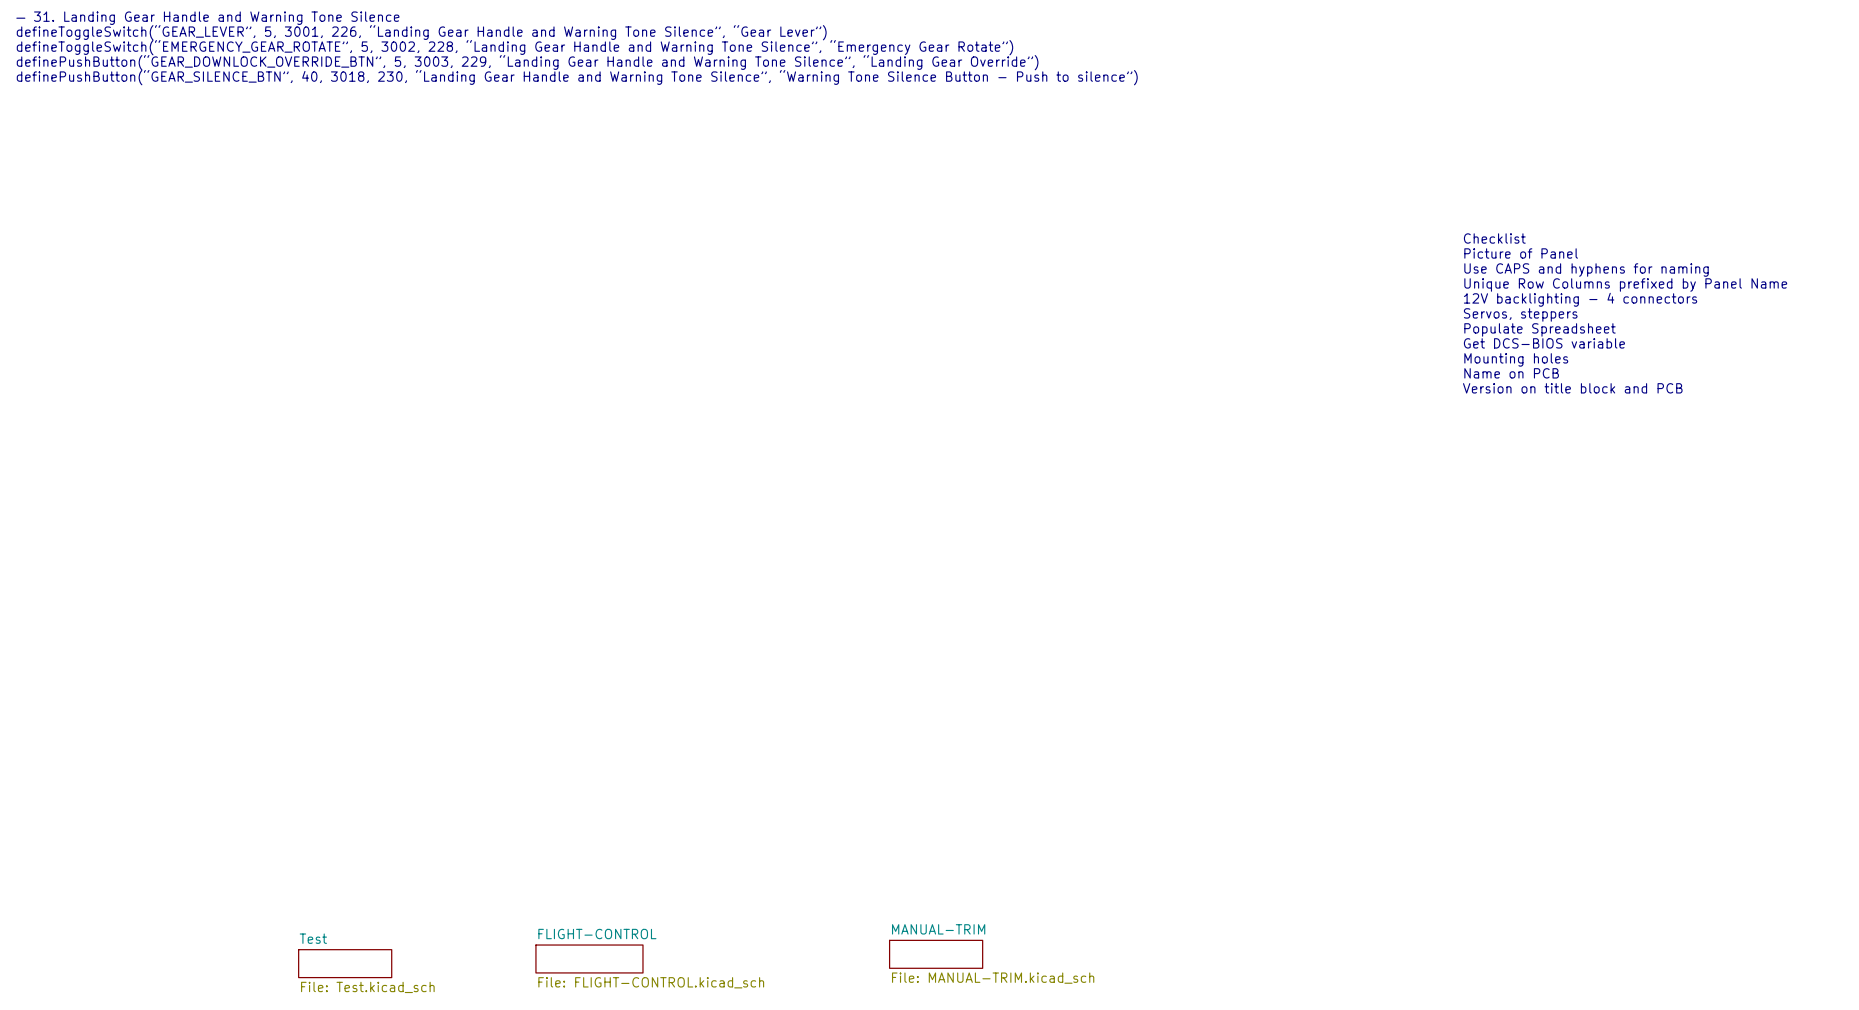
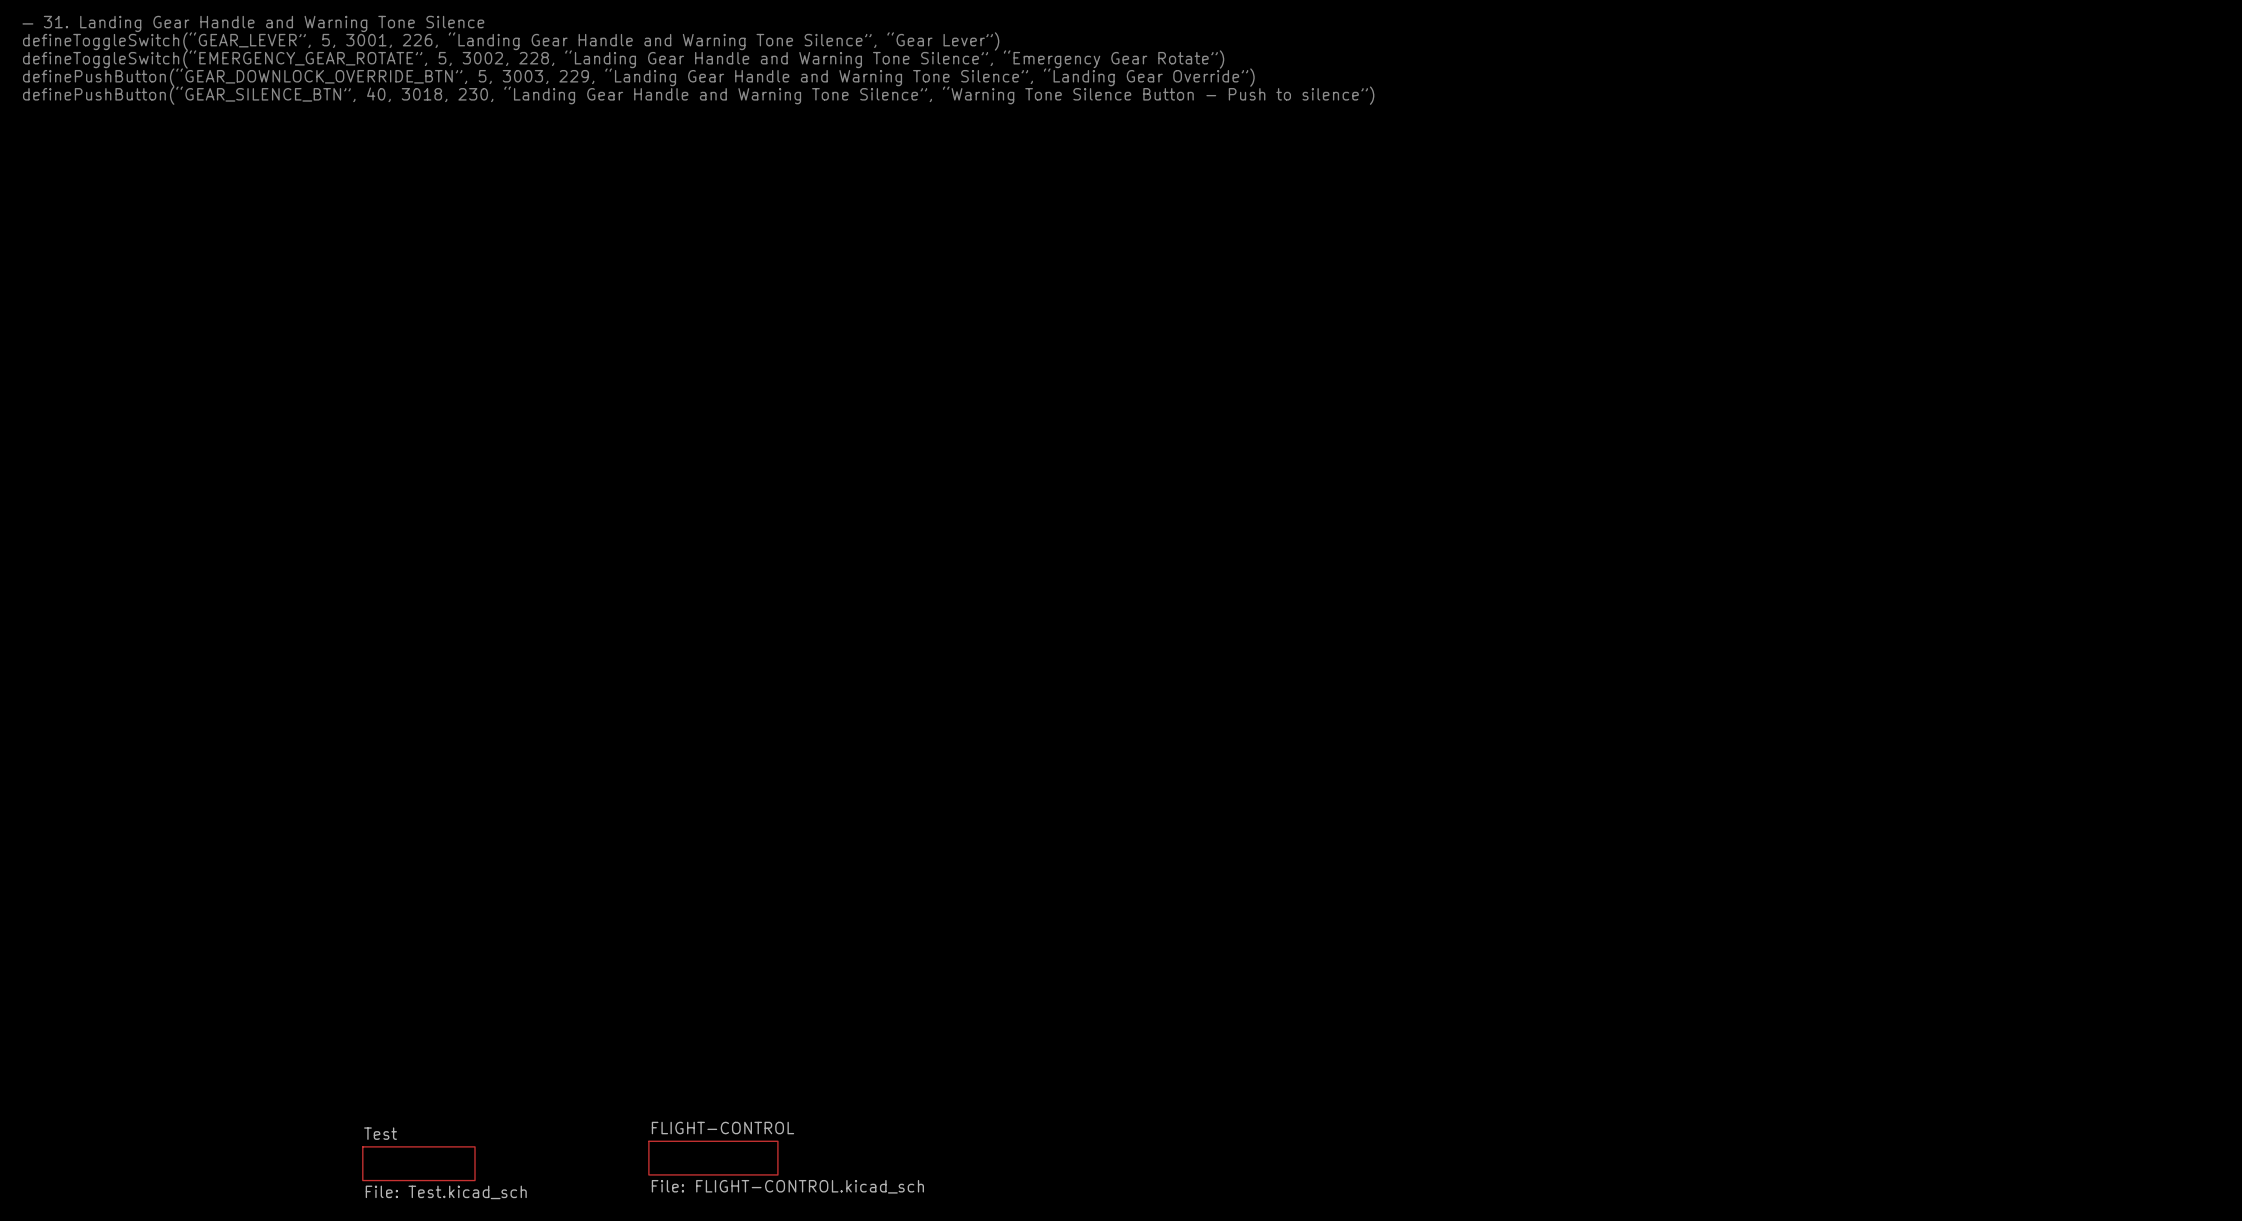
text: Checklist (1494, 238) -> none
text: Picture of Panel (1521, 253) -> none
text: Use CAPS and hyphens for naming (1586, 270) -> none
text: Unique Row Columns prefixed by Panel Name (1625, 285) -> none
text: 12V backlighting - 4 connectors (1580, 299) -> none
text: Servos, steppers (1520, 314) -> none
text: Populate Spreadsheet (1539, 329) -> none
text: Get DCS-BIOS variable (1544, 343) -> none
text: Mounting holes (1516, 359) -> none
text: Name on PCB (1511, 373) -> none
text: Version on title block and PCB (1572, 388) -> none
sheet MANUAL-TRIM: File: MANUAL-TRIM.kicad_sch (936, 954) -> none

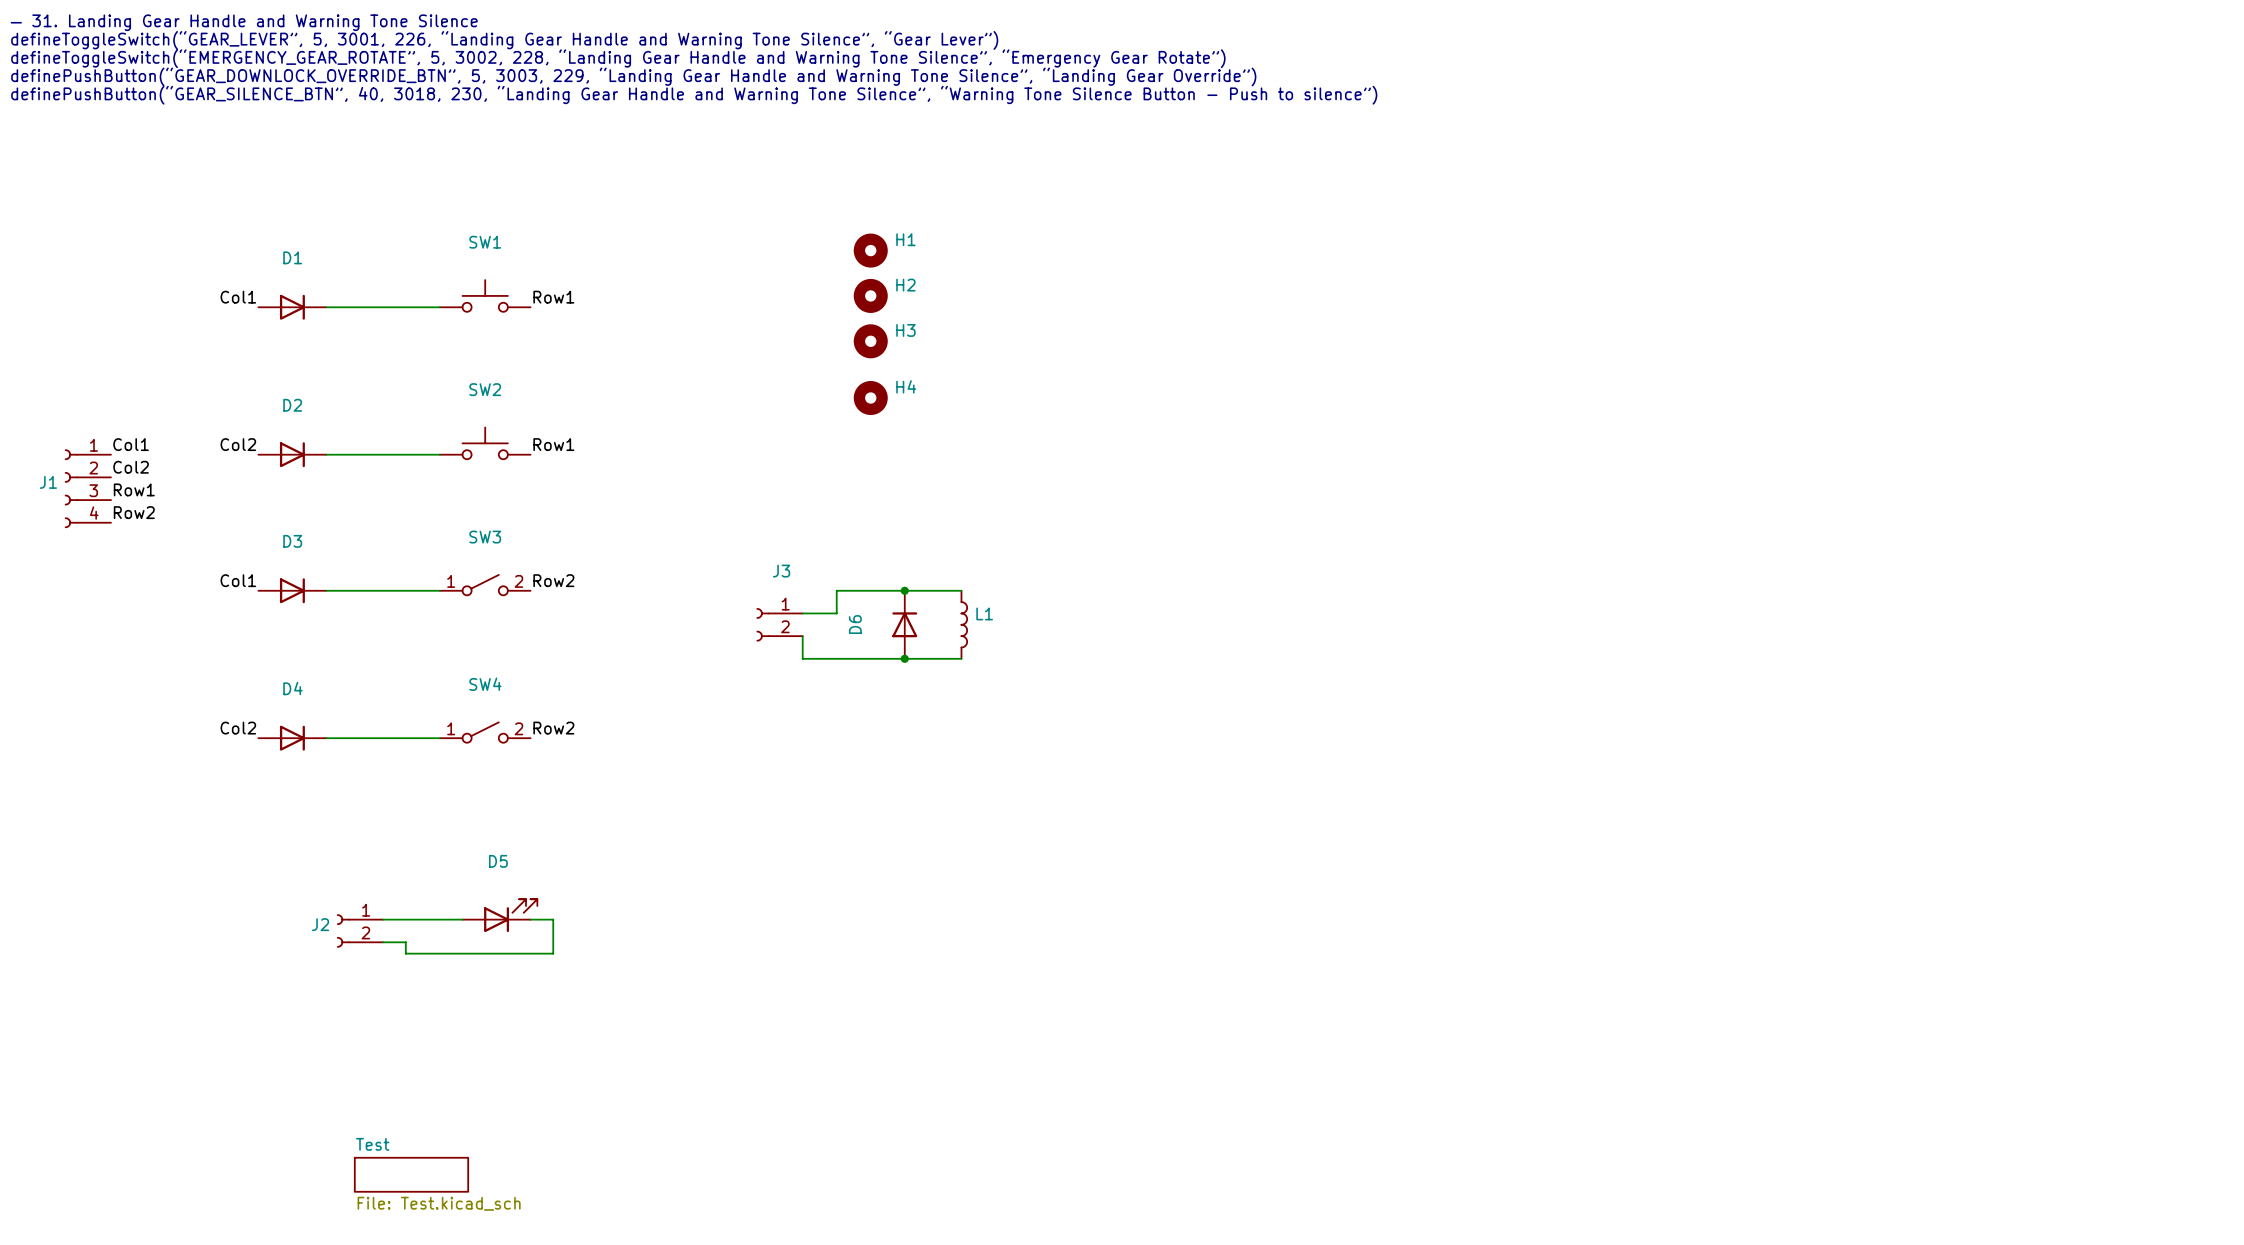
H1: none -> (870, 250)
SW1: none -> (485, 295)
H2: none -> (870, 295)
label: none -> Col1 (238, 297)
label: none -> Row1 (553, 297)
D1: none -> (292, 307)
wire: none -> (326, 307) (439, 307)
H3: none -> (870, 341)
H4: none -> (870, 398)
SW2: none -> (485, 443)
label: none -> Col1 (131, 444)
label: none -> Col2 (238, 444)
label: none -> Row1 (553, 444)
D2: none -> (292, 454)
wire: none -> (326, 454) (439, 454)
label: none -> Col2 (131, 467)
J1: none -> (87, 488)
label: none -> Row1 (134, 489)
label: none -> Row2 (134, 512)
label: none -> Col1 (238, 580)
label: none -> Row2 (553, 580)
SW3: none -> (485, 585)
D3: none -> (292, 590)
wire: none -> (326, 590) (439, 590)
junction: none -> (904, 590)
wire: none -> (961, 590) (836, 590) (836, 613) (802, 613)
J3: none -> (779, 624)
D6: none -> (904, 624)
L1: none -> (964, 624)
wire: none -> (802, 636) (802, 658) (961, 658)
junction: none -> (904, 658)
label: none -> Col2 (238, 728)
label: none -> Row2 (553, 728)
SW4: none -> (485, 732)
D4: none -> (292, 738)
wire: none -> (326, 738) (439, 738)
D5: none -> (499, 915)
wire: none -> (383, 919) (462, 919)
wire: none -> (530, 919) (553, 919) (553, 953) (405, 953) (405, 942) (383, 942)
J2: none -> (360, 930)
sheet FLIGHT-CONTROL: File: FLIGHT-CONTROL.kicad_sch (713, 1158) -> none

